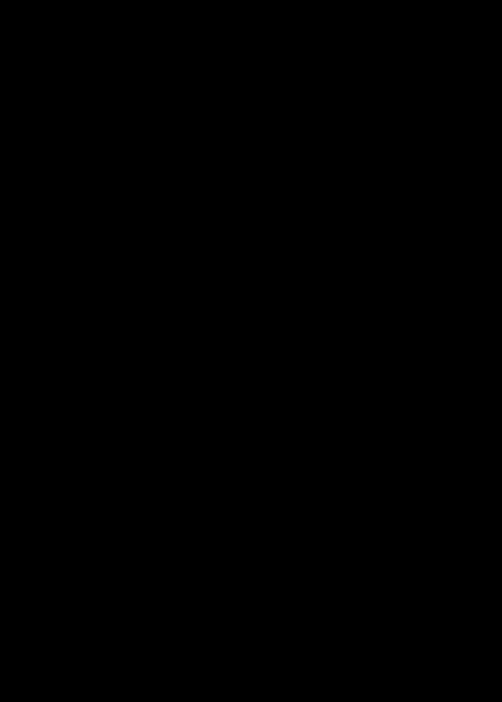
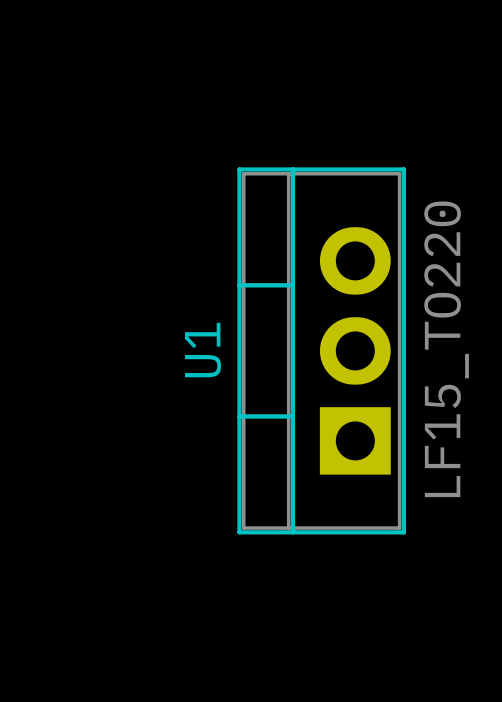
U1: none -> LF15_TO220 (321, 350)

